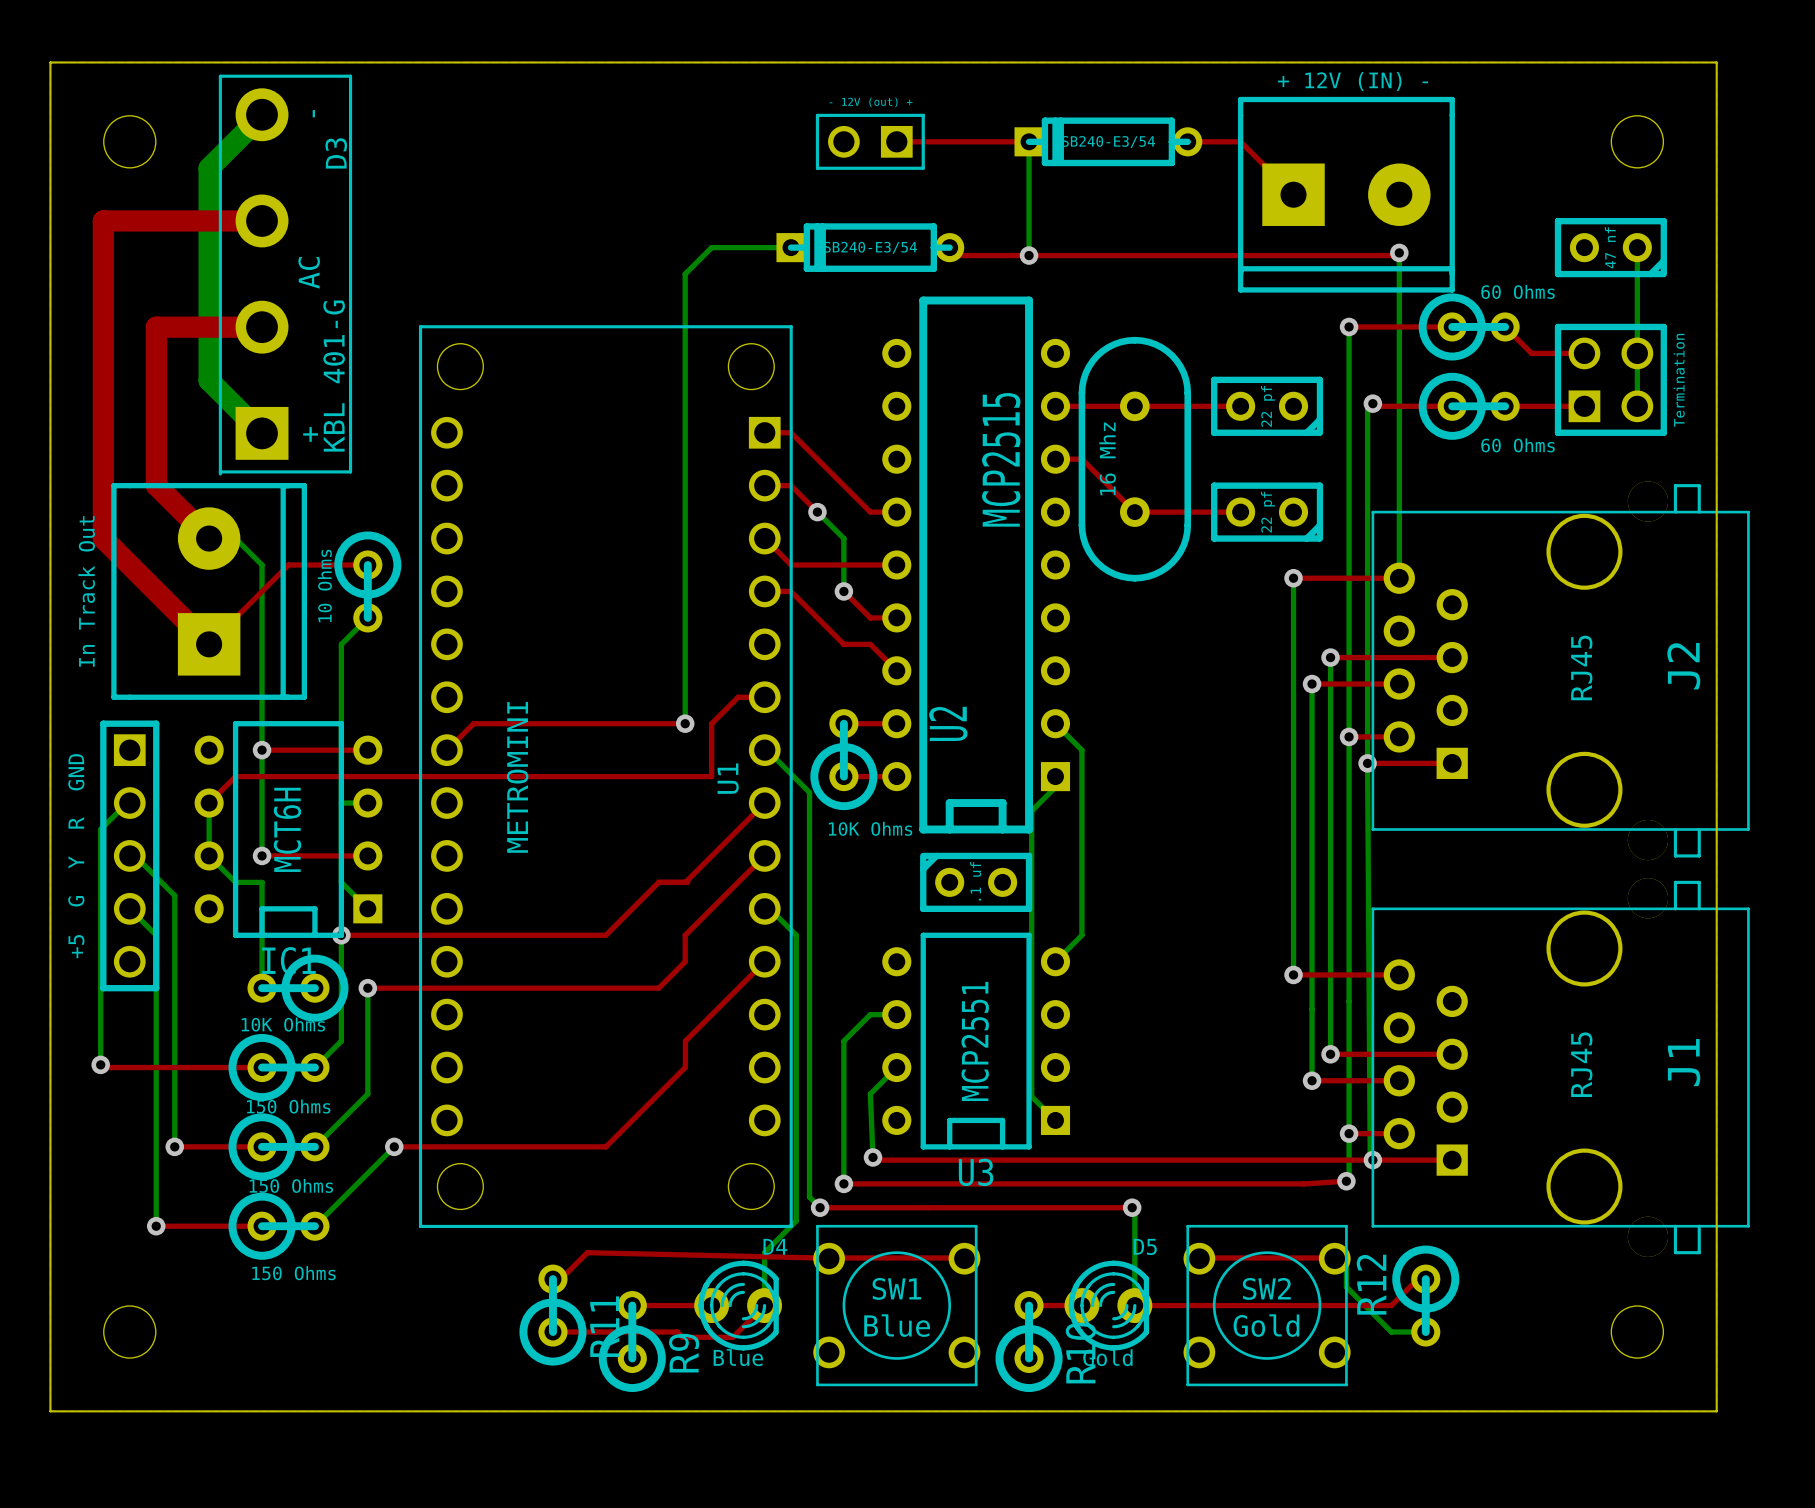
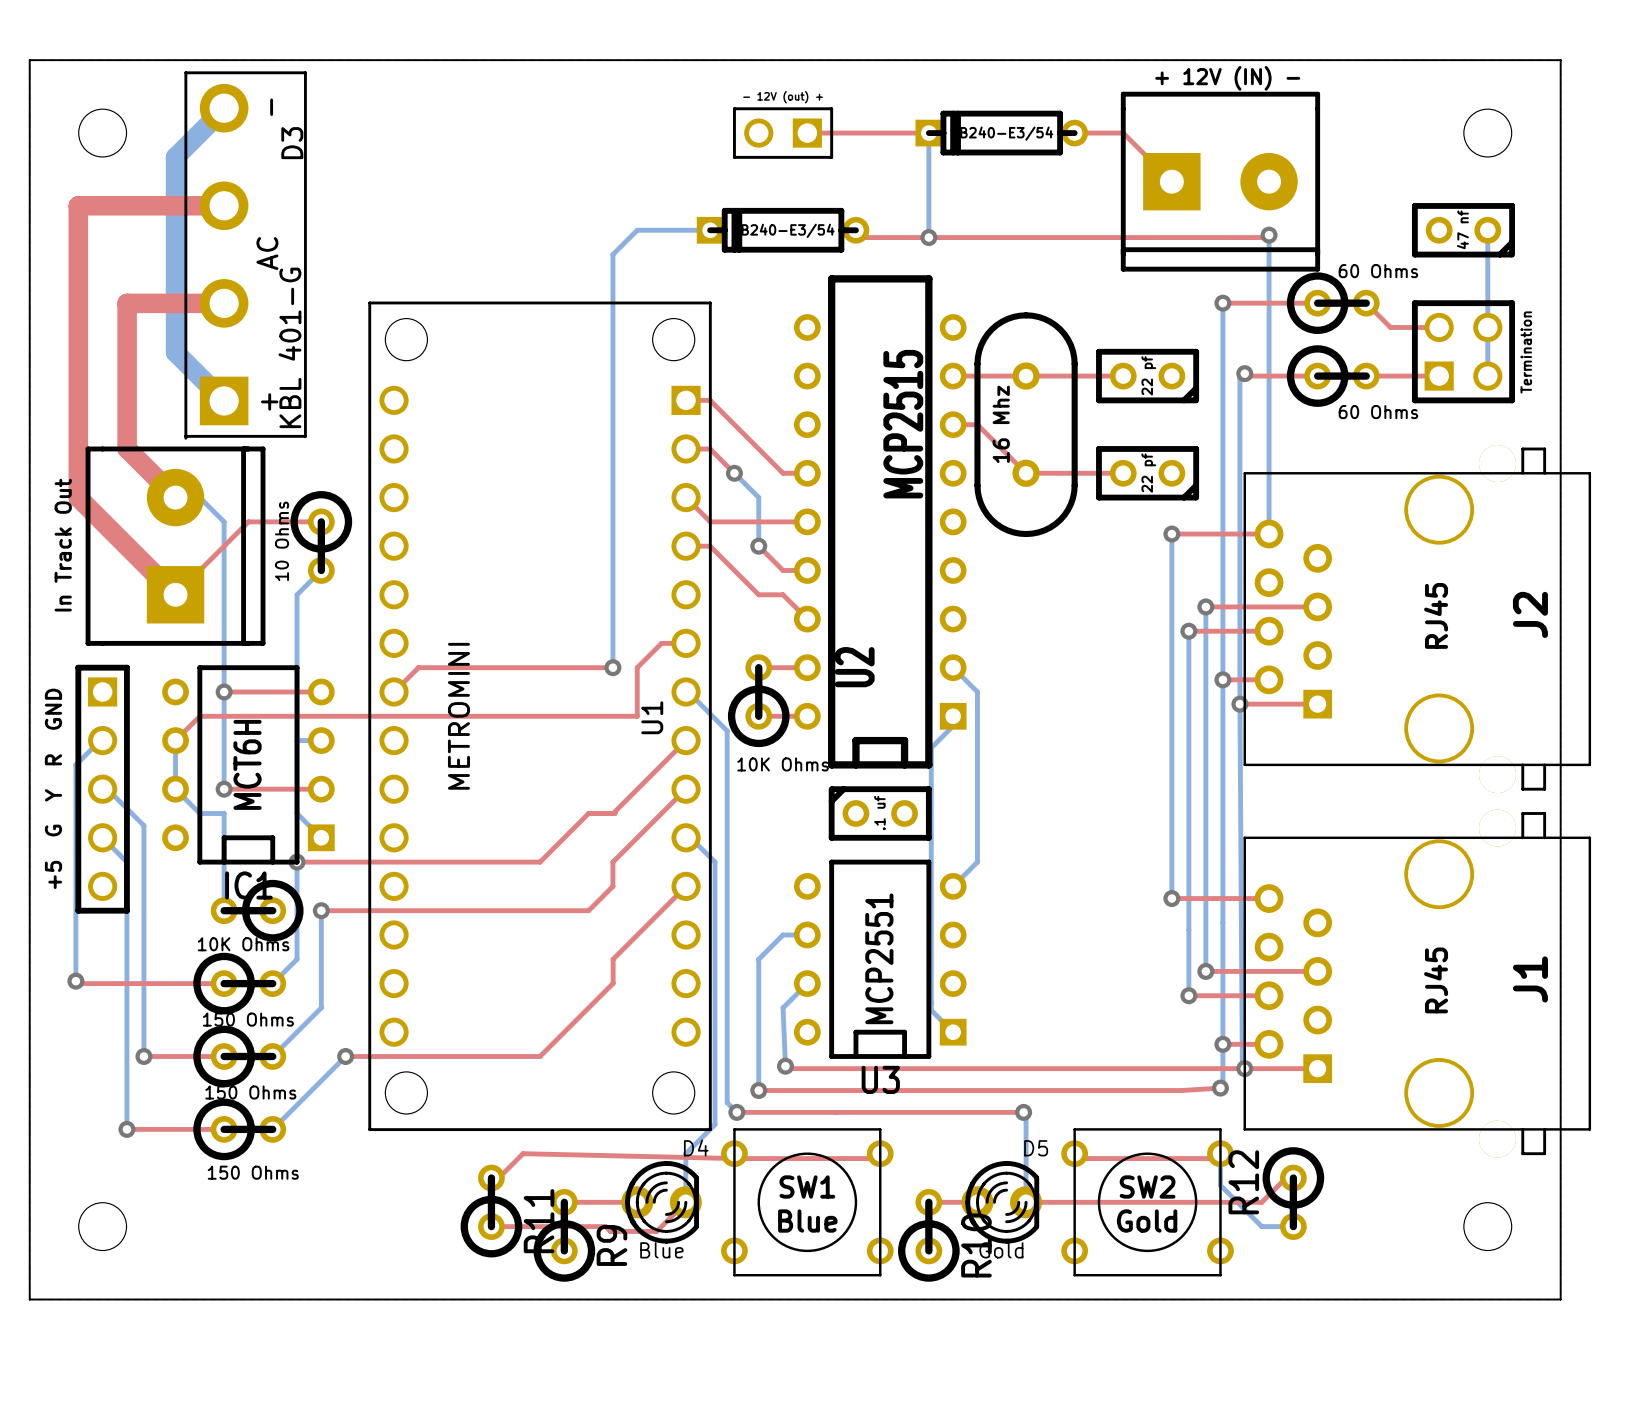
SW1 footprint: [813, 1224, 981, 1387] -> [721, 1128, 894, 1277]
SW2 footprint: [1183, 1224, 1351, 1387] -> [1061, 1128, 1234, 1277]

